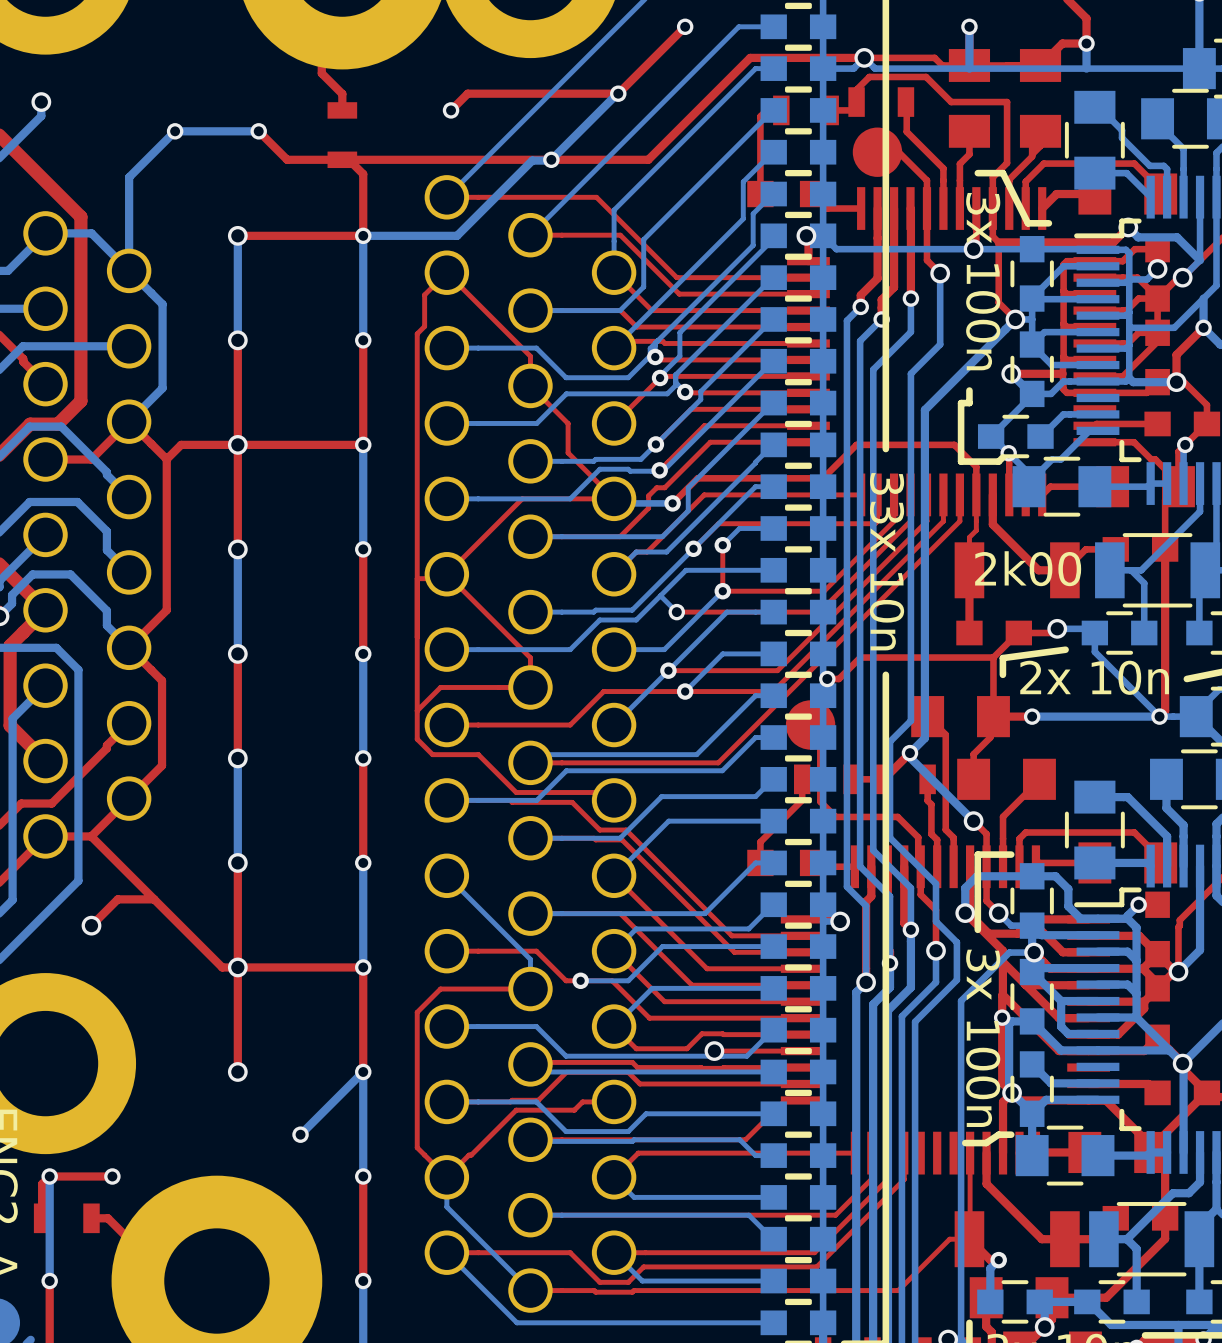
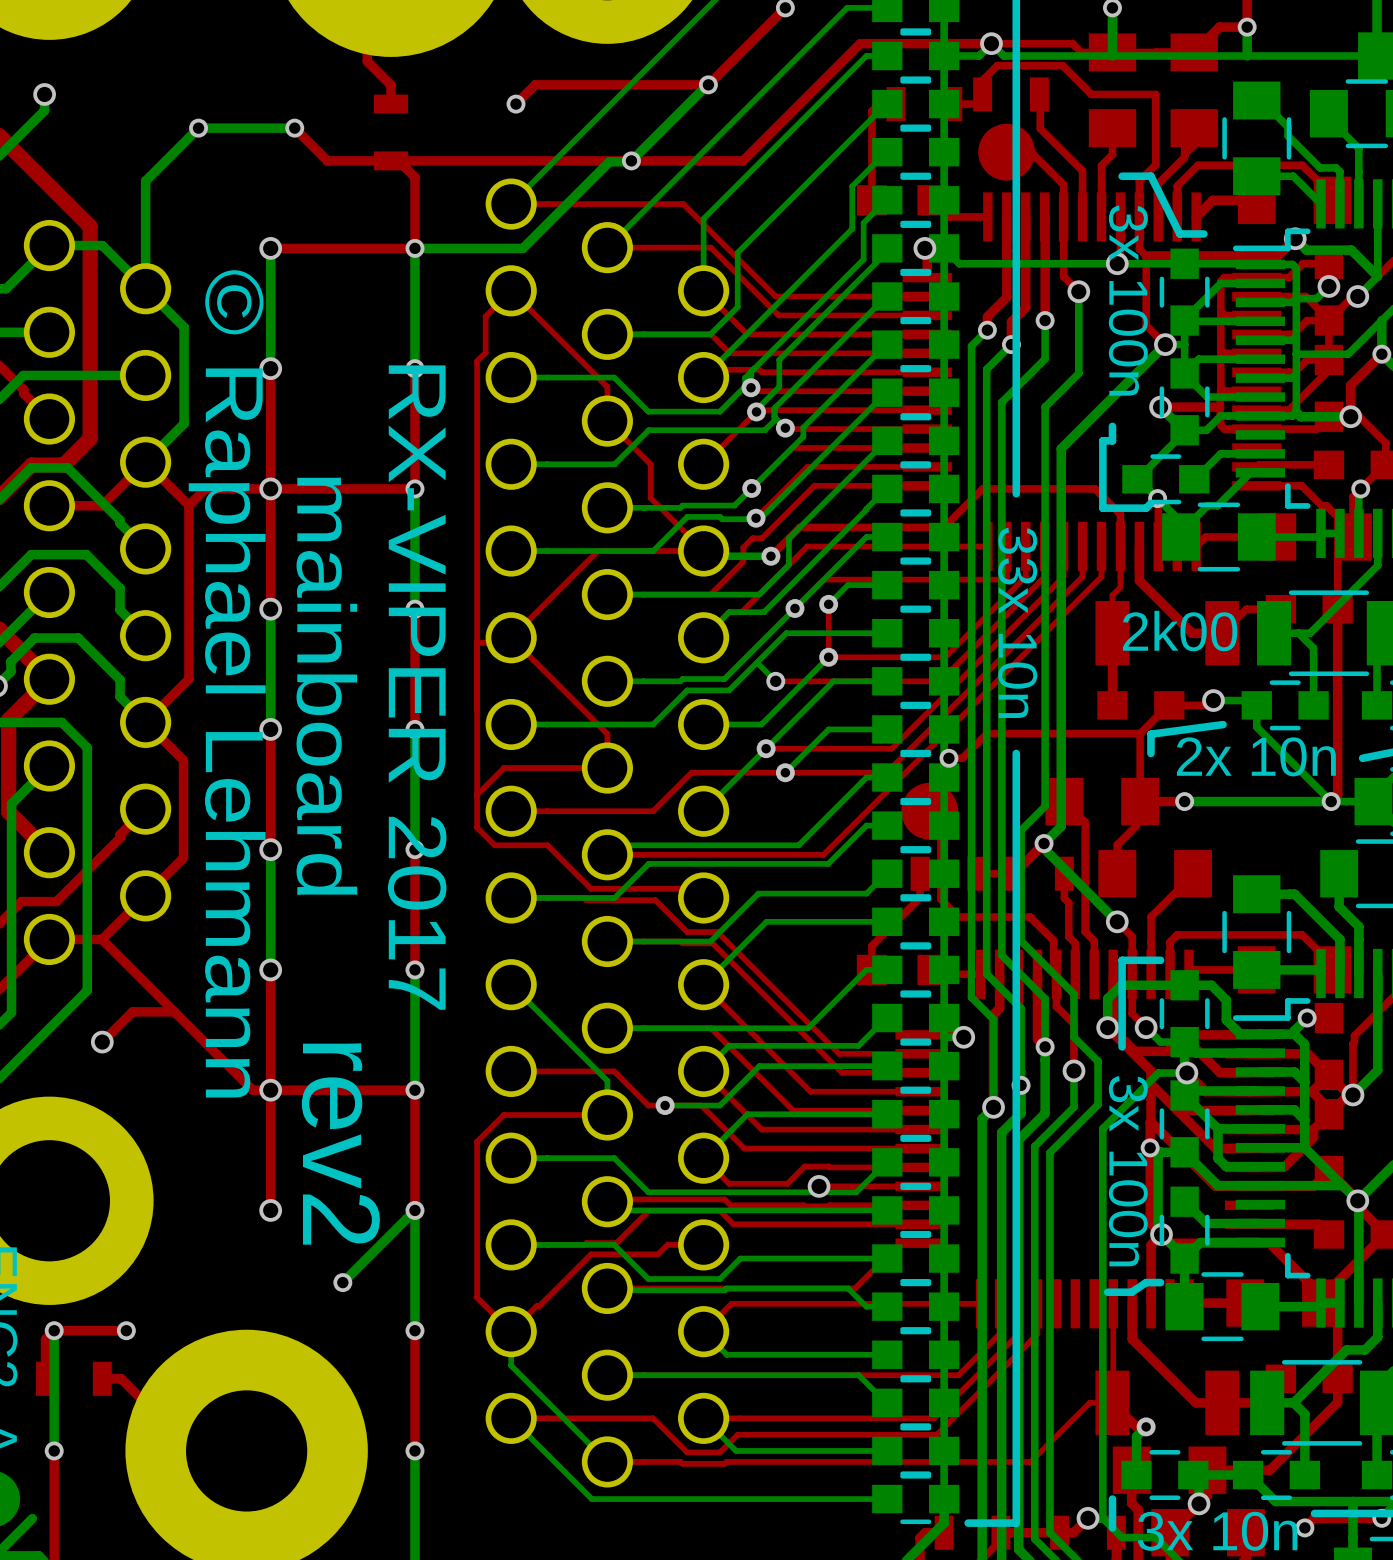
text: none -> mainboard (326, 686)
text: none -> RX-VIPER 2017 (417, 687)
text: none -> © Raphael Lehmann (227, 683)
text: none -> rev2 (340, 1143)

